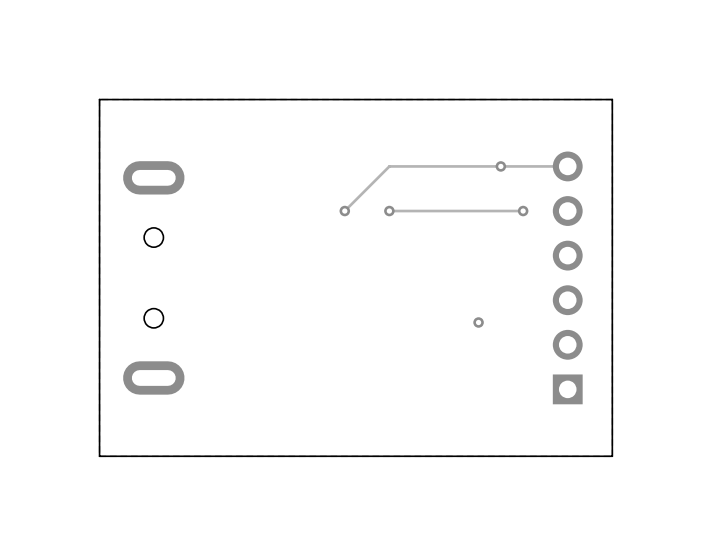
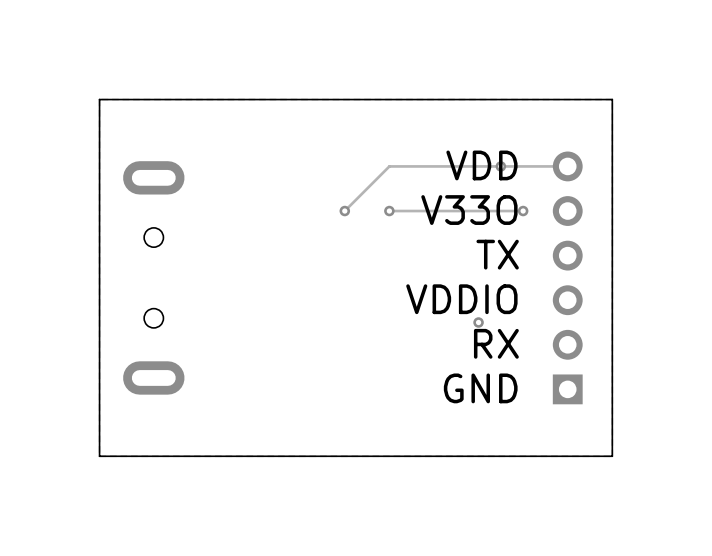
text: none -> VDD (481, 165)
text: none -> V33O (469, 210)
text: none -> TX (497, 254)
text: none -> VDDIO (461, 299)
text: none -> RX (496, 343)
text: none -> GND (480, 388)

